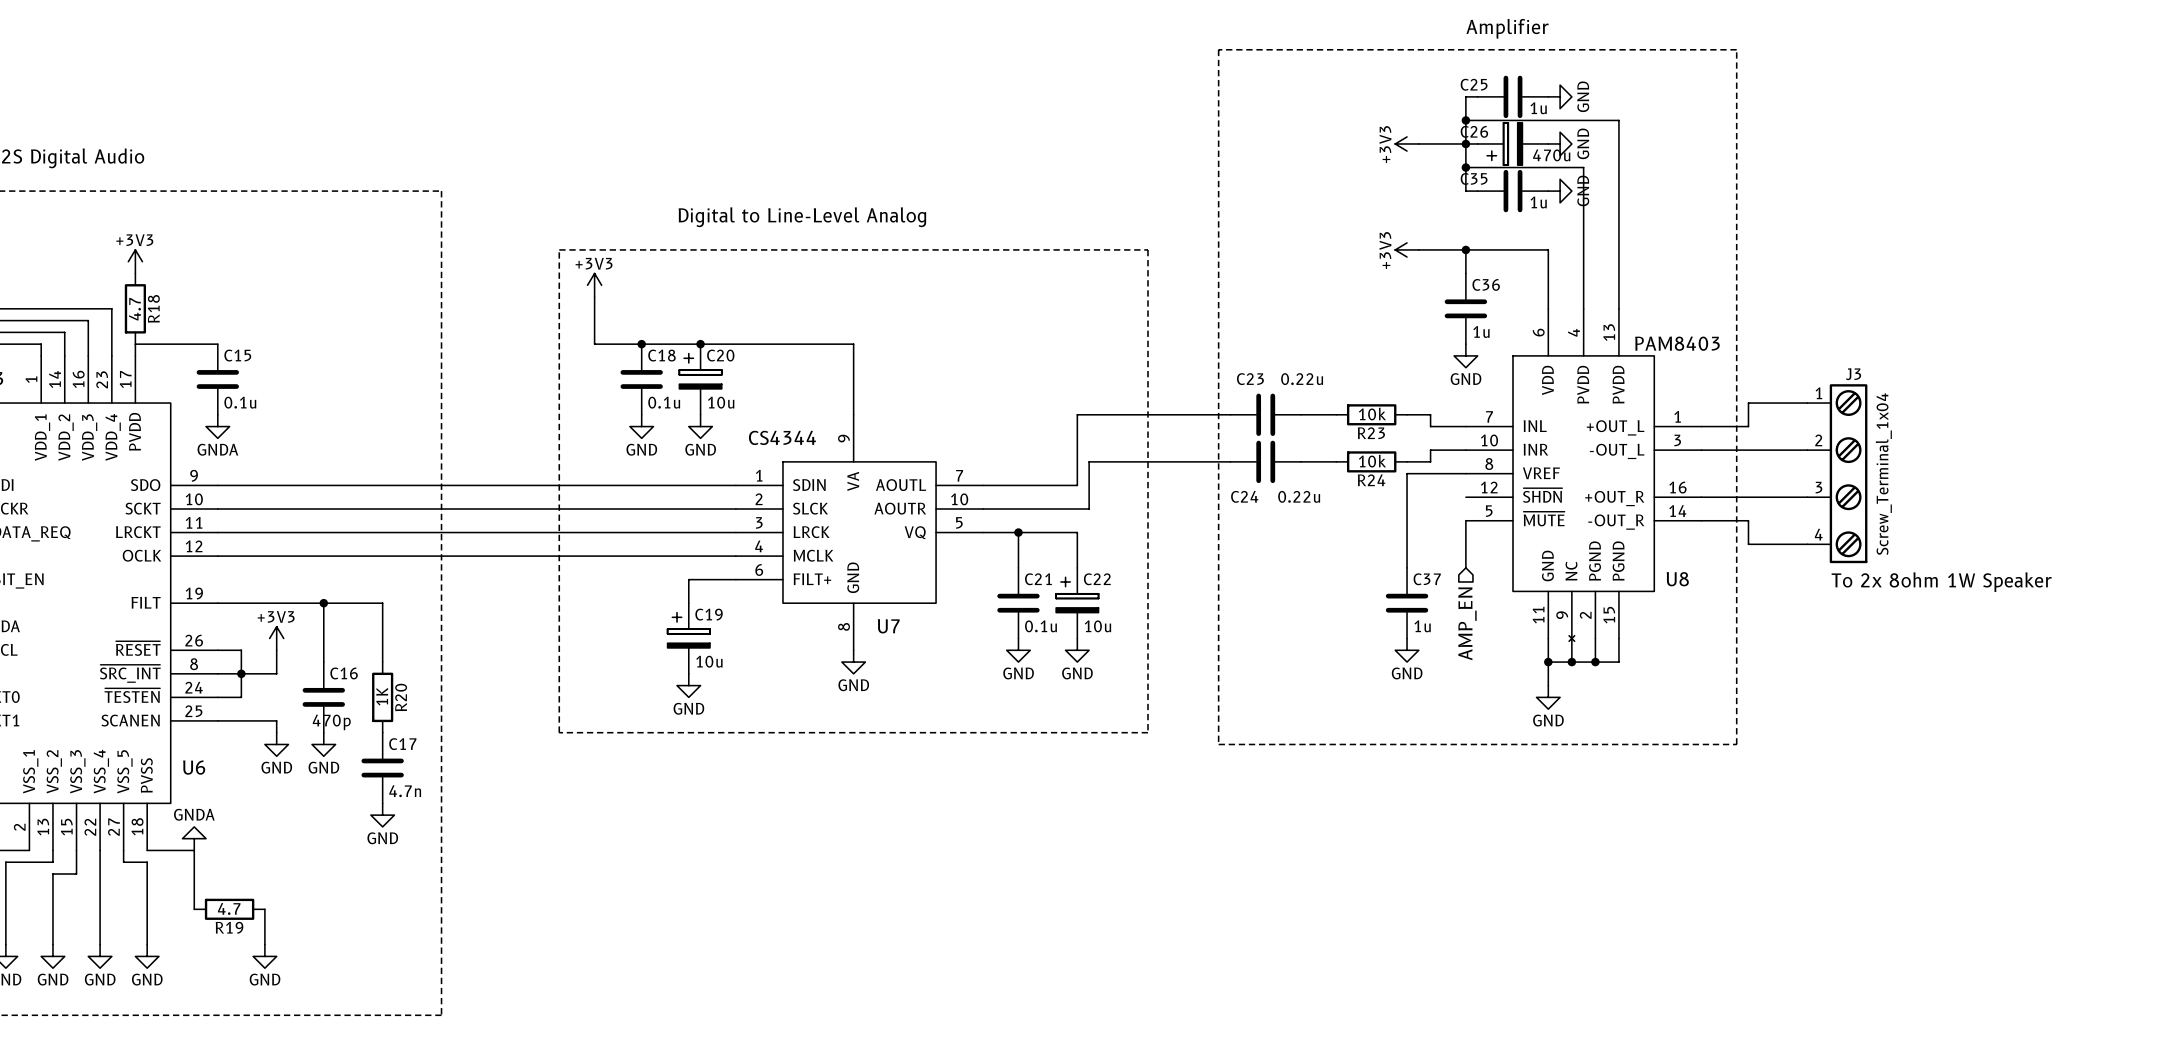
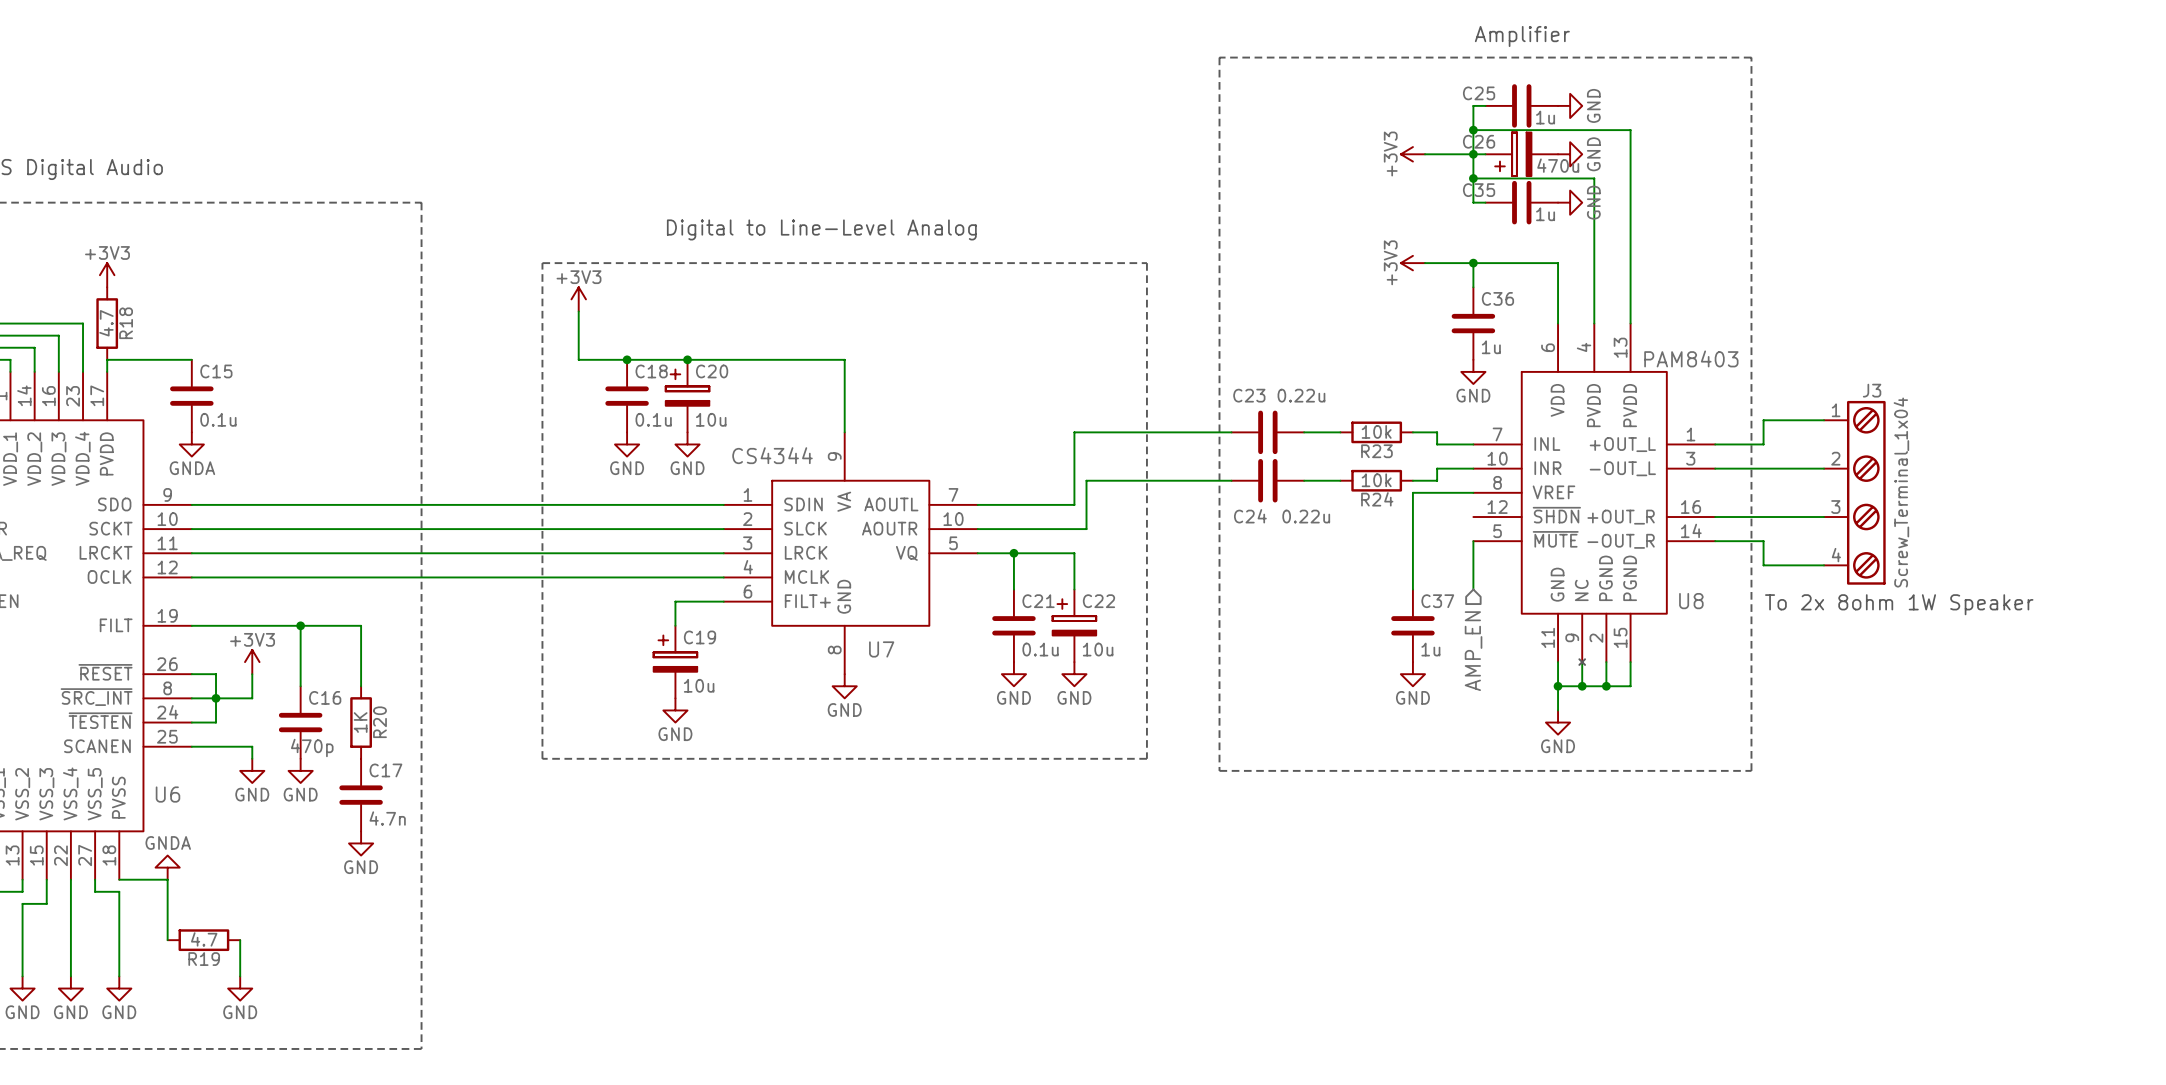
text position: To 2x 8ohm 1W Speaker (1941, 582) -> To 2x 8ohm 1W Speaker (1899, 604)

